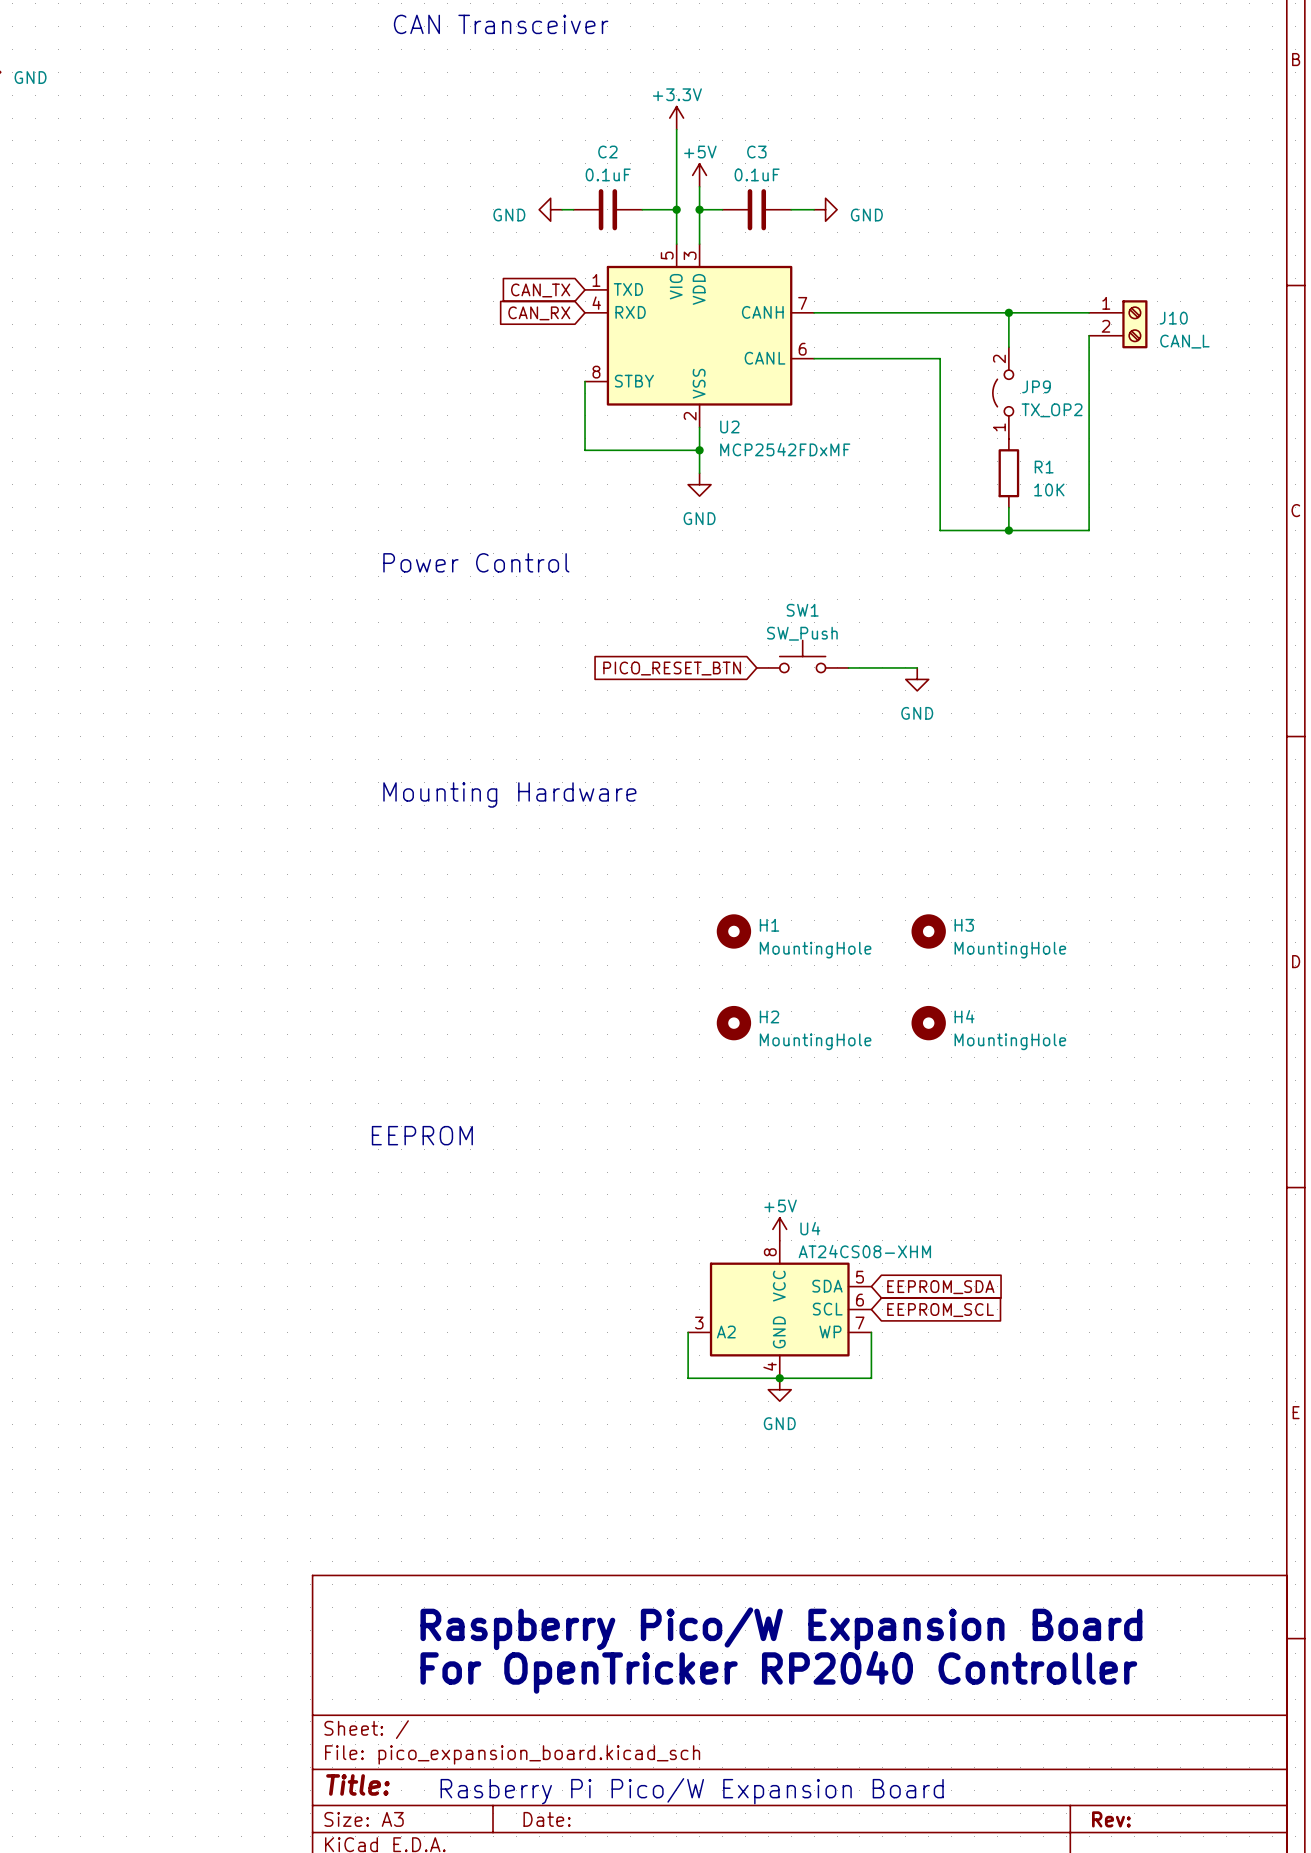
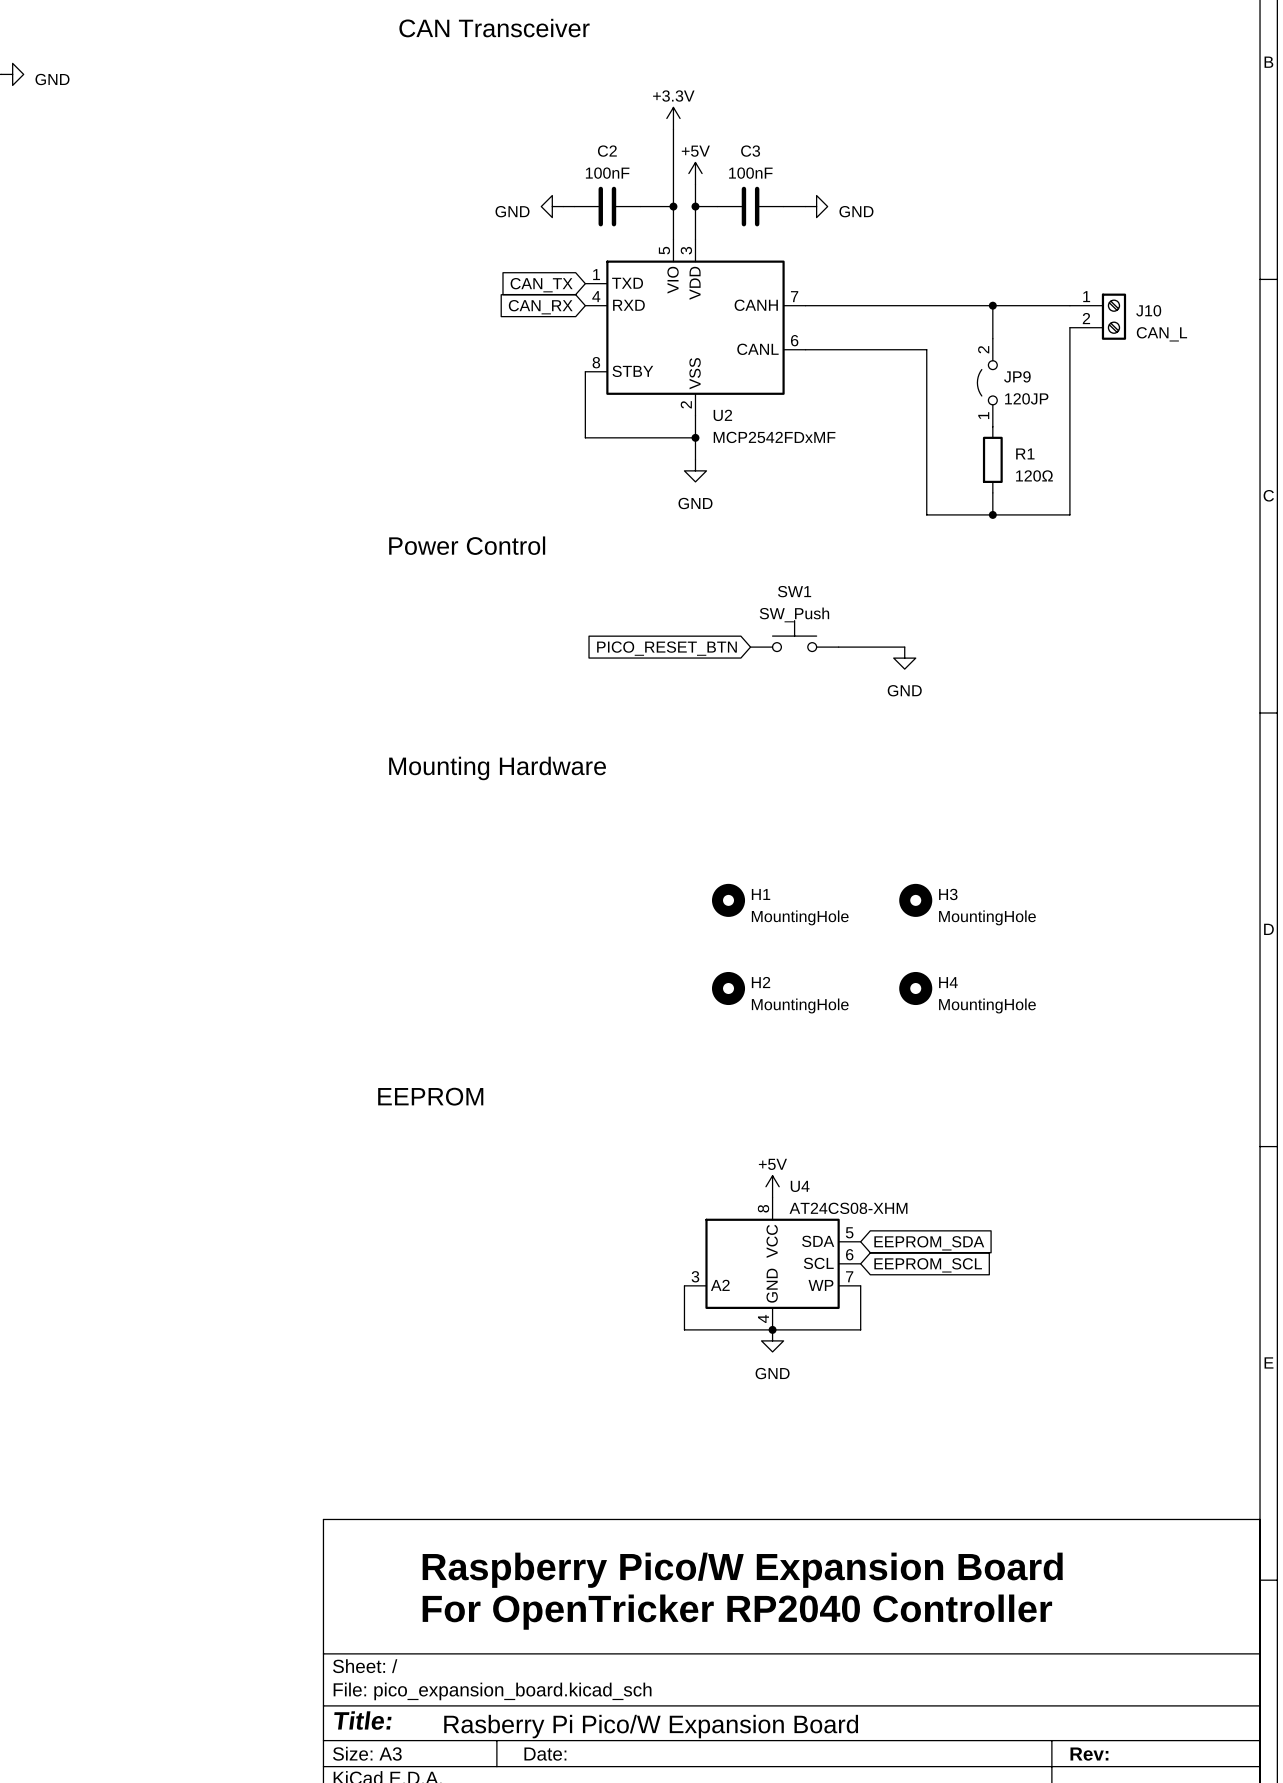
C2 value: 0.1uF (608, 174) -> 100nF (607, 173)
C3 value: 0.1uF (757, 174) -> 100nF (750, 173)
JP9 value: TX_OP2 (1052, 410) -> 120JP (1026, 398)
R1 value: 10K (1049, 489) -> 120Ω (1034, 475)

